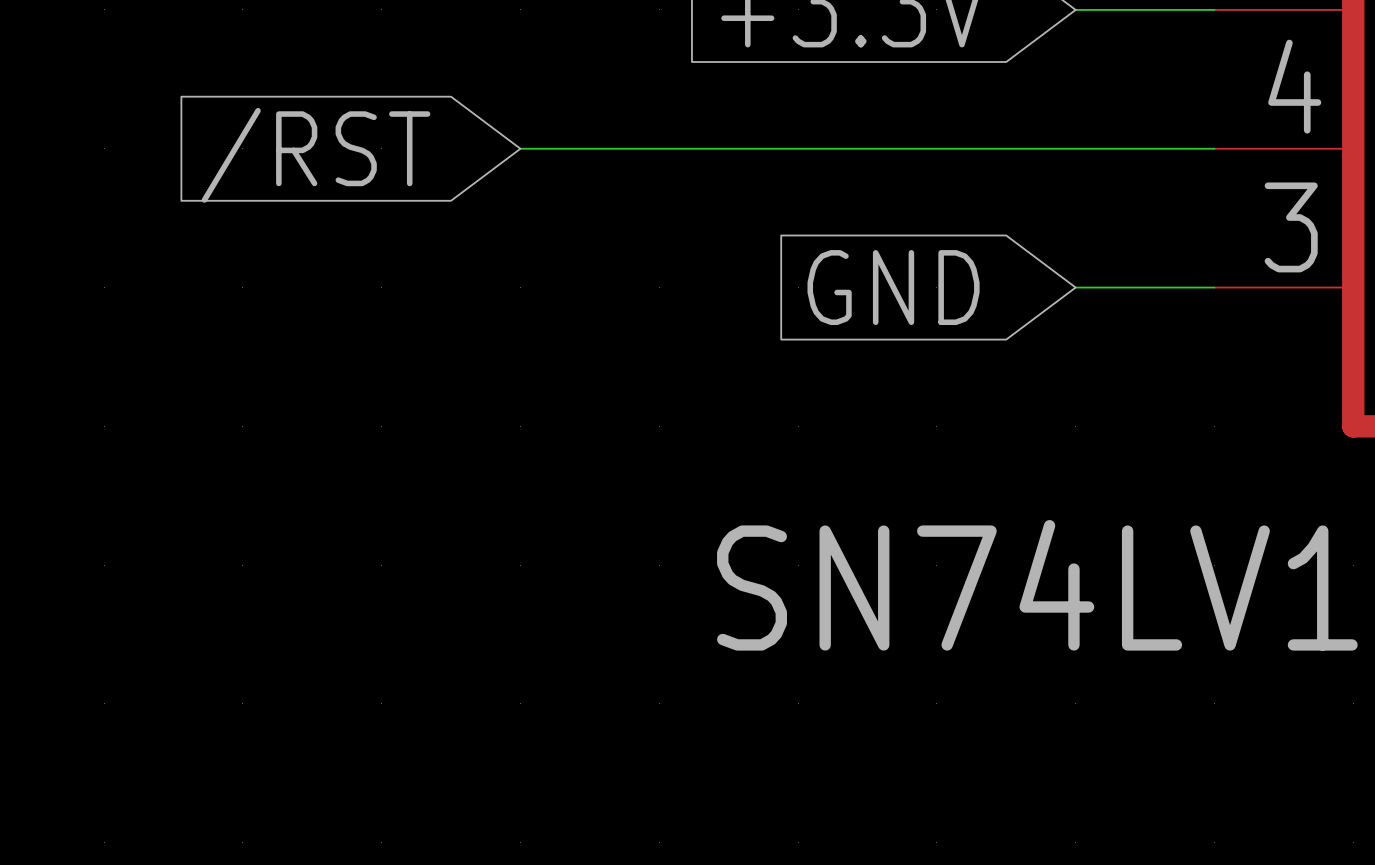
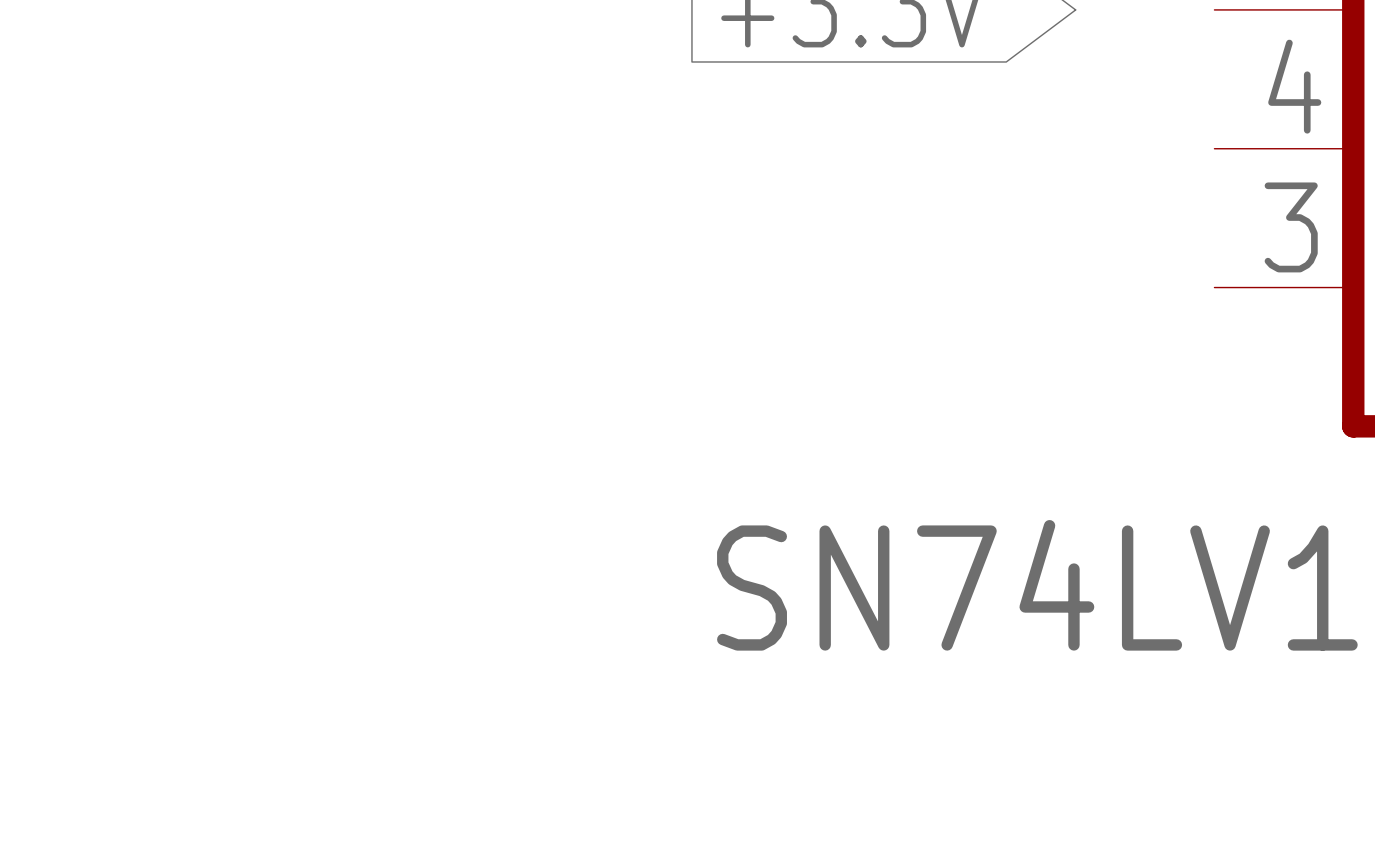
wire: (1075, 9) (1214, 9) -> none
wire: (520, 148) (1214, 148) -> none
global label: /RST (316, 155) -> none
global label: GND (893, 287) -> none
wire: (1075, 287) (1214, 287) -> none

